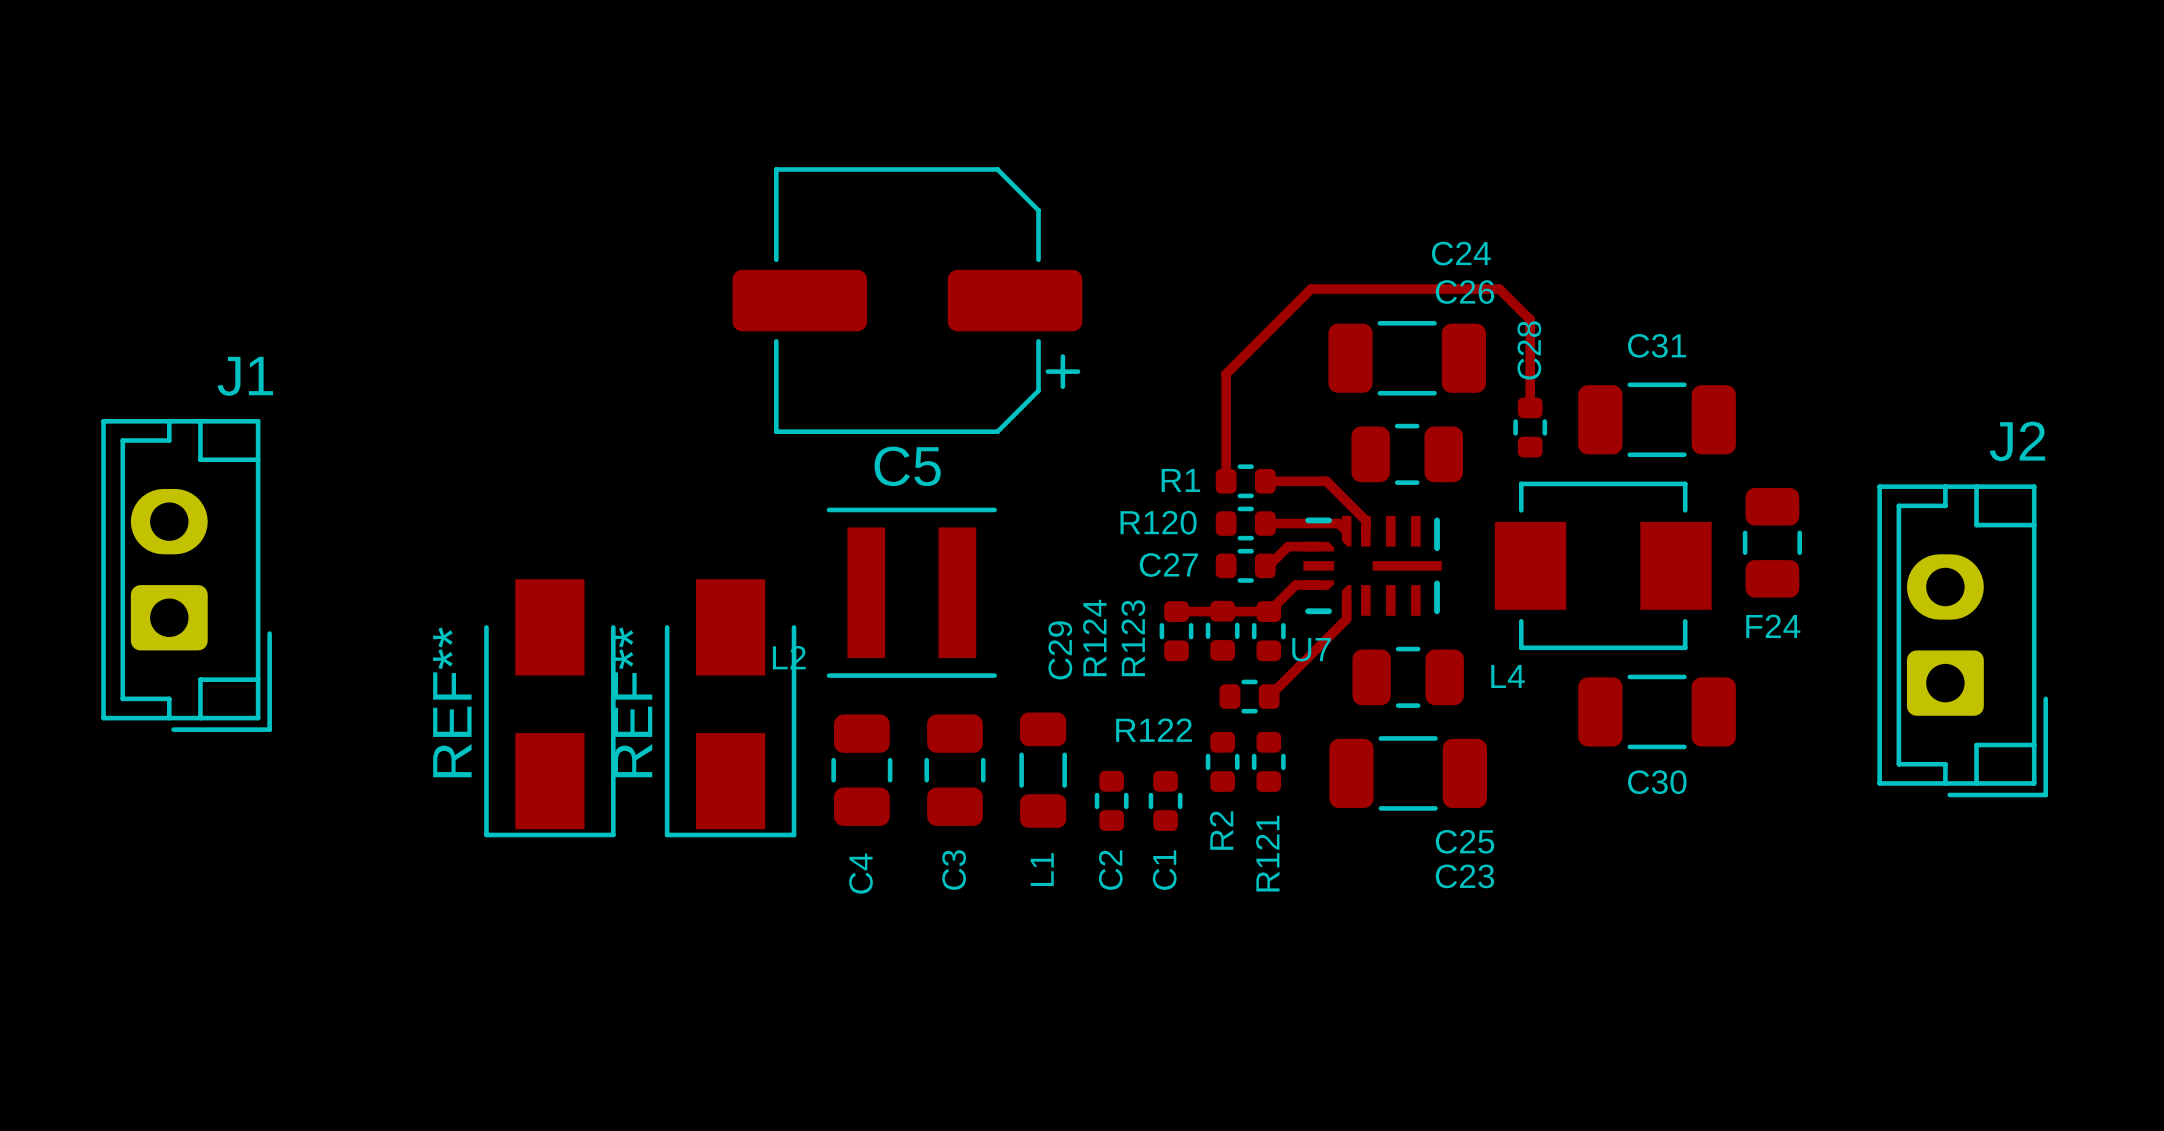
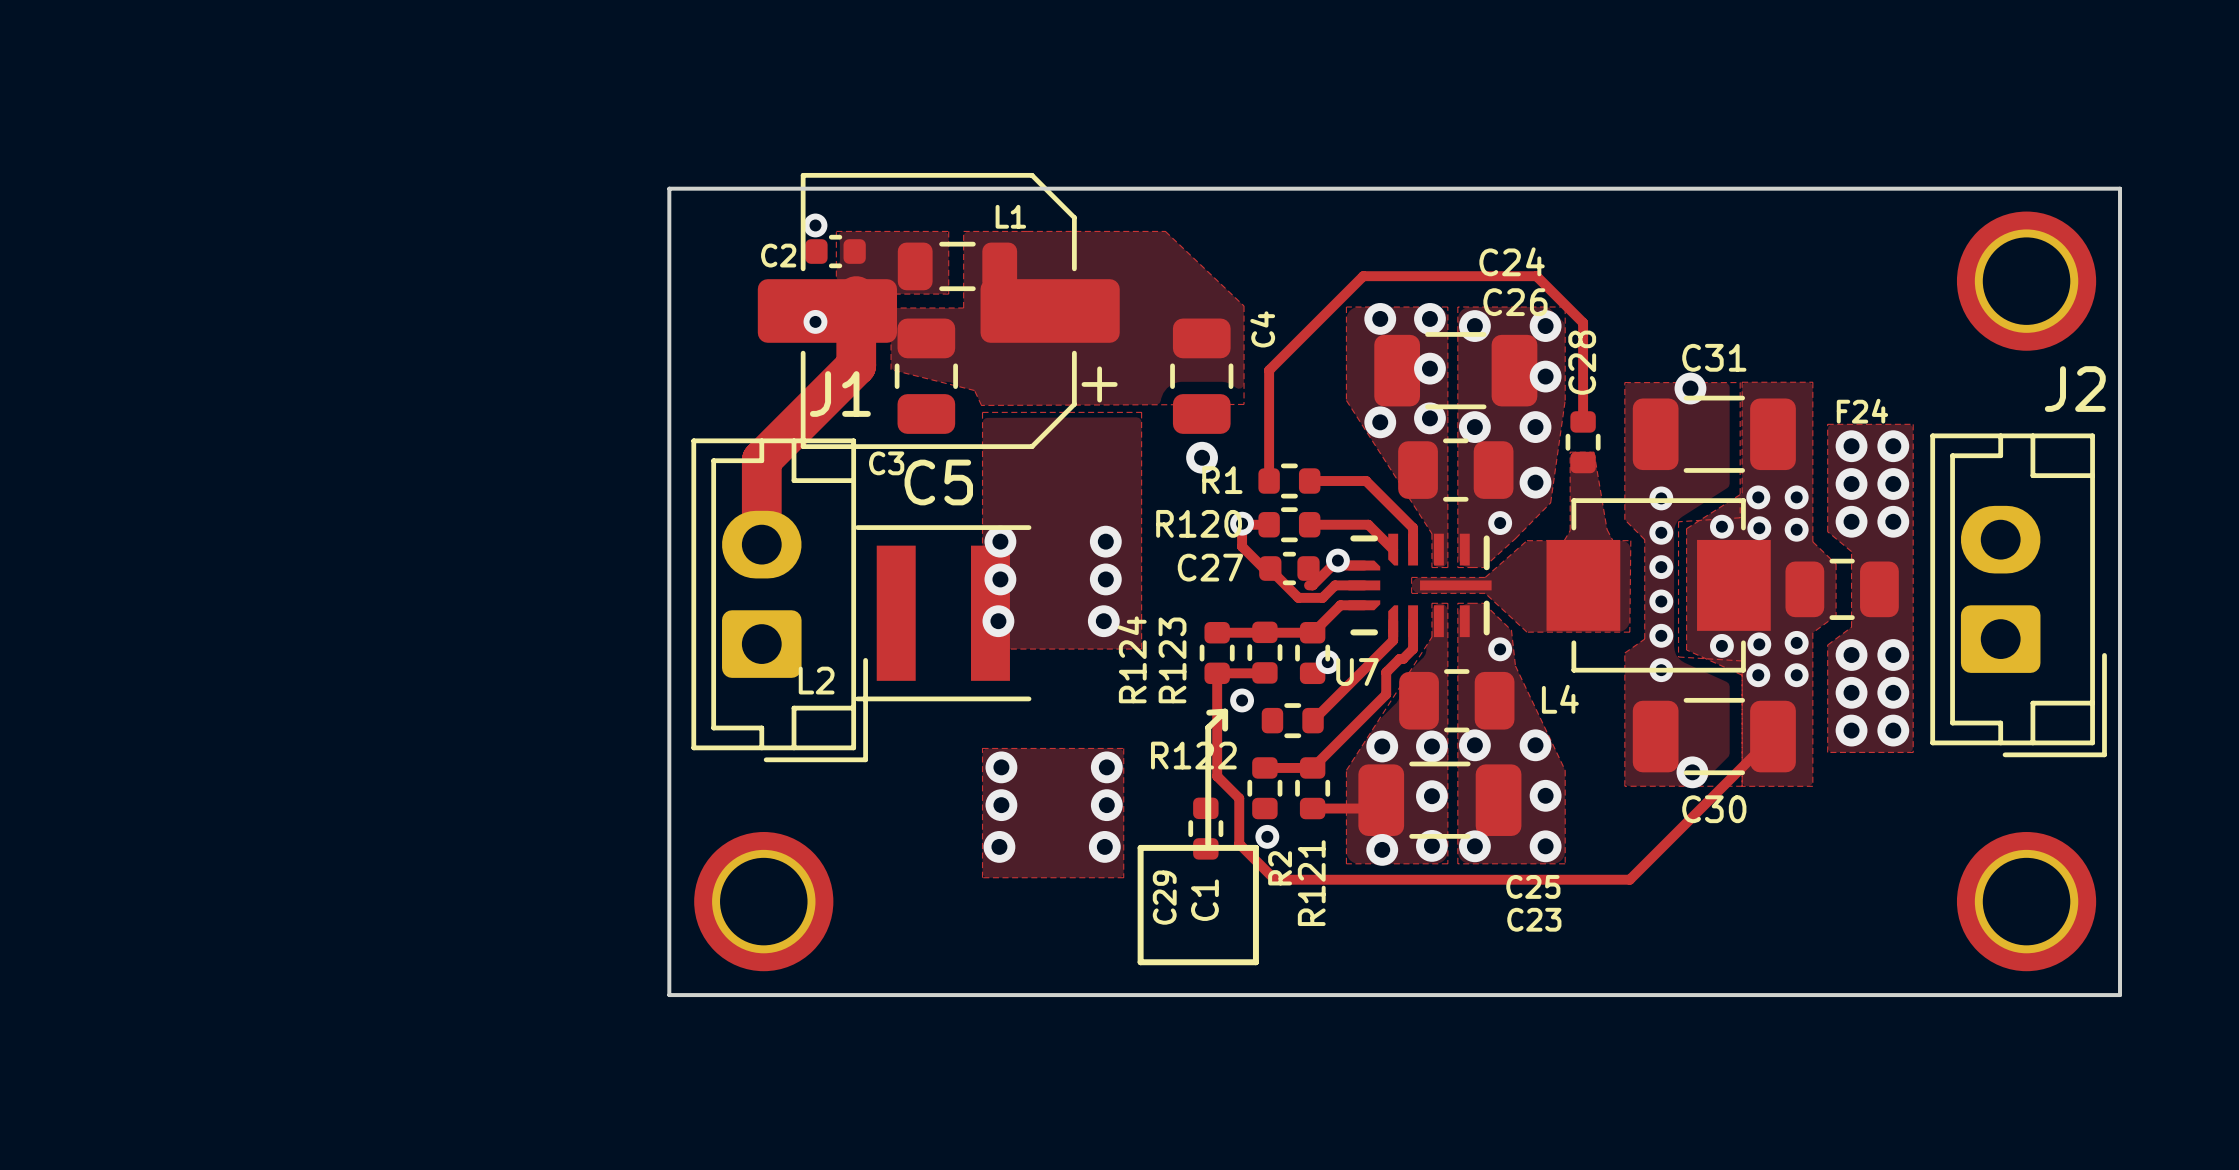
board edge: none -> (669, 188) (2120, 188) (2120, 995) (669, 995) (669, 188)
via: none -> (815, 225)
zone outline: none -> (836, 231) (836, 314) (868, 314) (884, 294) (948, 294) (948, 231) (836, 231)
zone outline: none -> (963, 231) (1165, 231) (1244, 306) (1244, 404) (981, 405) (974, 390) (891, 369) (891, 307) (963, 307) (963, 231)
part: none -> (2026, 281)
track: none -> (856, 296) (856, 365) (761, 460) (761, 528)
zone outline: none -> (1346, 307) (1346, 400) (1431, 533) (1431, 567) (1447, 567) (1447, 307) (1346, 307)
zone outline: none -> (1457, 307) (1565, 307) (1565, 400) (1550, 502) (1483, 567) (1457, 567) (1457, 307)
via: none -> (1380, 318)
via: none -> (1429, 318)
via: none -> (815, 321)
via: none -> (1474, 326)
via: none -> (1545, 326)
track: (1530, 319) (1499, 289) (1311, 289) (1226, 374) (1226, 481) -> (1583, 330) (1583, 322) (1536, 276) (1363, 276) (1269, 370) (1269, 481)
via: none -> (1429, 368)
via: none -> (1545, 376)
via: none -> (1690, 388)
zone outline: none -> (982, 412) (982, 649) (1141, 649) (1141, 412) (982, 412)
via: none -> (1429, 418)
via: none -> (1380, 422)
zone outline: none -> (1827, 424) (1827, 531) (1851, 551) (1851, 627) (1827, 645) (1827, 752) (1913, 752) (1913, 424) (1827, 424)
via: none -> (1474, 427)
via: none -> (1535, 427)
via: none -> (1851, 446)
via: none -> (1893, 446)
zone outline: none -> (1570, 452) (1570, 530) (1564, 540) (1526, 540) (1485, 577) (1411, 577) (1411, 593) (1485, 593) (1526, 632) (1629, 632) (1630, 540) (1612, 540) (1607, 529) (1594, 452) (1570, 452)
via: none -> (1202, 457)
via: none -> (1535, 482)
via: none -> (1851, 483)
via: none -> (1893, 483)
via: none -> (1758, 497)
via: none -> (1796, 497)
R1 position: (1245, 481) -> (1289, 481)
track: (1265, 481) (1326, 481) (1365, 520) -> (1309, 481) (1366, 481) (1413, 527) (1413, 538)
via: none -> (1661, 498)
via: none -> (1851, 521)
via: none -> (1893, 521)
via: none -> (1500, 523)
via: none -> (1242, 523)
track: none -> (1269, 524) (1242, 523) (1242, 546) (1263, 568) (1269, 568) (1298, 597) (1322, 597) (1335, 585) (1364, 585)
via: none -> (1721, 526)
via: none -> (1759, 528)
via: none -> (1796, 529)
via: none -> (1661, 532)
via: none -> (1000, 541)
via: none -> (1105, 541)
R120 position: (1245, 523) -> (1289, 524)
track: (1265, 523) (1338, 523) -> (1309, 524) (1368, 524) (1385, 541)
via: none -> (1337, 560)
F24 rotation: 0° (1772, 542) -> 90° clockwise (1842, 589)
C27 footprint: [1215, 548, 1276, 583] -> [1259, 551, 1320, 586]
via: none -> (1661, 567)
via: none -> (1000, 579)
via: none -> (1105, 579)
C27 name position: C27 (1168, 564) -> C27 (1210, 567)
J1 position: (186, 575) -> (779, 600)
via: none -> (1661, 601)
zone outline: none -> (1431, 603) (1431, 637) (1346, 770) (1346, 863) (1447, 863) (1447, 603) (1431, 603)
zone outline: none -> (1457, 603) (1483, 603) (1511, 630) (1515, 665) (1565, 770) (1565, 863) (1457, 863) (1457, 603)
via: none -> (998, 621)
via: none -> (1103, 621)
track: none -> (1413, 621) (1413, 649) (1386, 672) (1386, 694) (1312, 767) (1264, 767)
via: none -> (1661, 635)
via: none -> (1796, 642)
via: none -> (1759, 644)
via: none -> (1721, 645)
F24 name position: F24 (1773, 626) -> F24 (1862, 411)
via: none -> (1500, 649)
via: none -> (1851, 655)
via: none -> (1893, 655)
via: none -> (1327, 662)
J2 position: (1962, 640) -> (2018, 595)
via: none -> (1661, 670)
C29 name position: C29 (1060, 650) -> C29 (1164, 897)
track: none -> (1264, 673) (1217, 673) (1217, 776) (1239, 798) (1239, 843) (1275, 879) (1629, 879) (1772, 736)
zone outline: none -> (1742, 675) (1686, 649) (1686, 528) (1742, 493) (1742, 382) (1812, 382) (1812, 541) (1836, 564) (1836, 615) (1812, 632) (1812, 786) (1624, 786) (1624, 653) (1644, 639) (1644, 539) (1624, 519) (1624, 382) (1740, 382) (1740, 517) (1678, 521) (1678, 657) (1742, 660) (1742, 786)
via: none -> (1758, 675)
via: none -> (1796, 675)
via: none -> (1851, 692)
via: none -> (1893, 692)
via: none -> (1242, 700)
line: none -> (1225, 711) (1209, 712)
line: none -> (1225, 711) (1225, 728)
line: none -> (1225, 711) (1208, 727) (1208, 843)
via: none -> (1851, 730)
via: none -> (1893, 730)
REF**: (549, 708) -> none
REF**: (730, 708) -> none
via: none -> (1474, 745)
via: none -> (1535, 745)
via: none -> (1382, 746)
via: none -> (1431, 746)
zone outline: none -> (982, 748) (982, 877) (1123, 877) (1123, 748) (982, 748)
via: none -> (1001, 767)
via: none -> (1106, 767)
via: none -> (1692, 772)
via: none -> (1431, 796)
via: none -> (1545, 795)
C4 position: (861, 770) -> (1201, 376)
C3 position: (954, 770) -> (926, 376)
L1 rotation: 0° (1043, 770) -> 90° clockwise (957, 266)
L1 position: (1043, 770) -> (957, 266)
C2 footprint: [1094, 770, 1129, 831] -> [805, 234, 866, 269]
track: none -> (1381, 800) (1372, 808) (1312, 808)
C23 position: (1408, 773) -> (1439, 800)
via: none -> (1001, 805)
via: none -> (1106, 805)
via: none -> (1267, 836)
via: none -> (1431, 845)
via: none -> (999, 846)
via: none -> (1104, 846)
via: none -> (1474, 846)
via: none -> (1545, 846)
line: none -> (1140, 847) (1255, 847) (1255, 962) (1140, 962) (1140, 847)
via: none -> (1382, 849)
R2 name position: R2 (1221, 830) -> R2 (1280, 868)
C25 name position: C25 (1465, 841) -> C25 (1533, 886)
L1 name position: L1 (1042, 869) -> L1 (1010, 216)
C3 name rotation: 0° (954, 870) -> 90° clockwise (886, 463)
C2 name position: C2 (1110, 870) -> C2 (778, 255)
part: none -> (763, 901)
part: none -> (2026, 901)
C4 name position: C4 (860, 873) -> C4 (1262, 329)
C23 name position: C23 (1464, 876) -> C23 (1534, 919)

